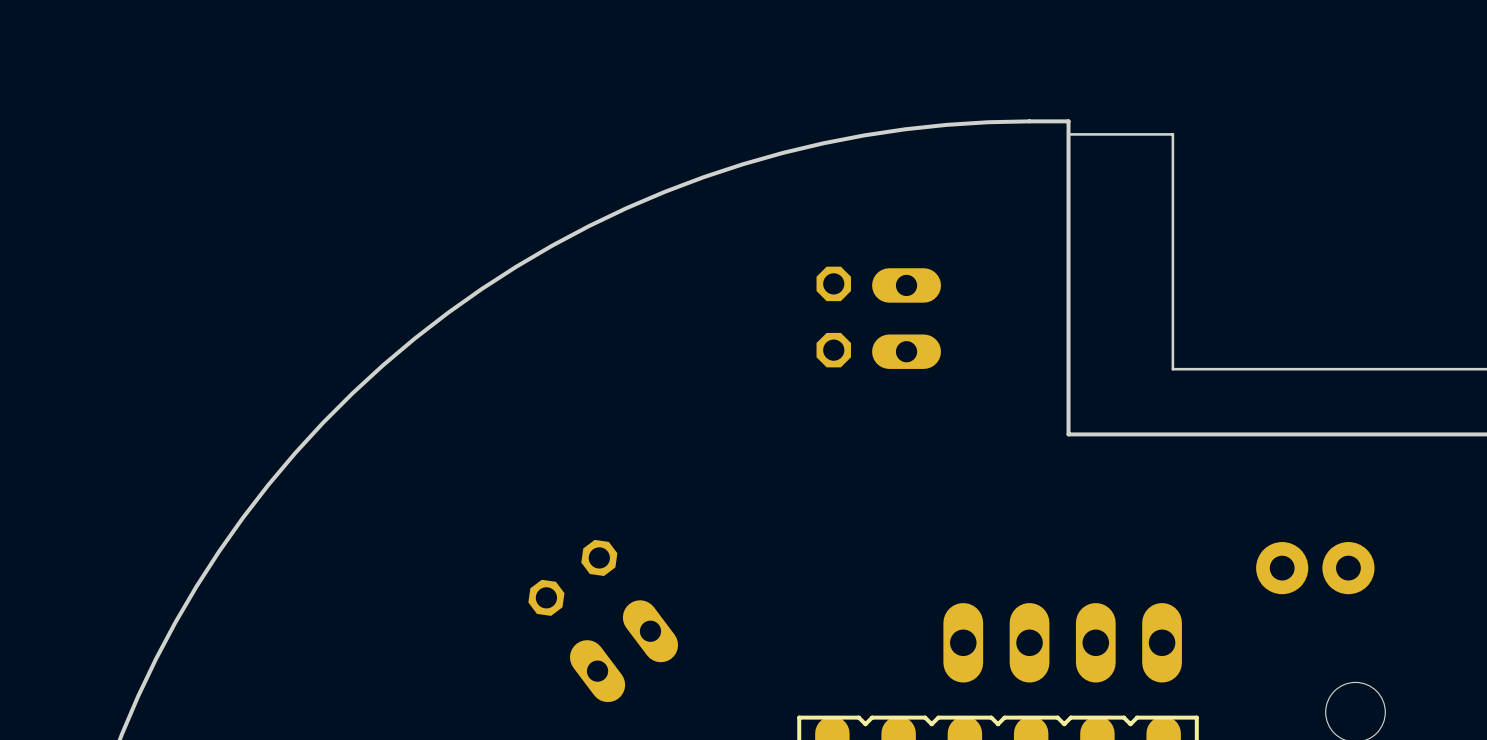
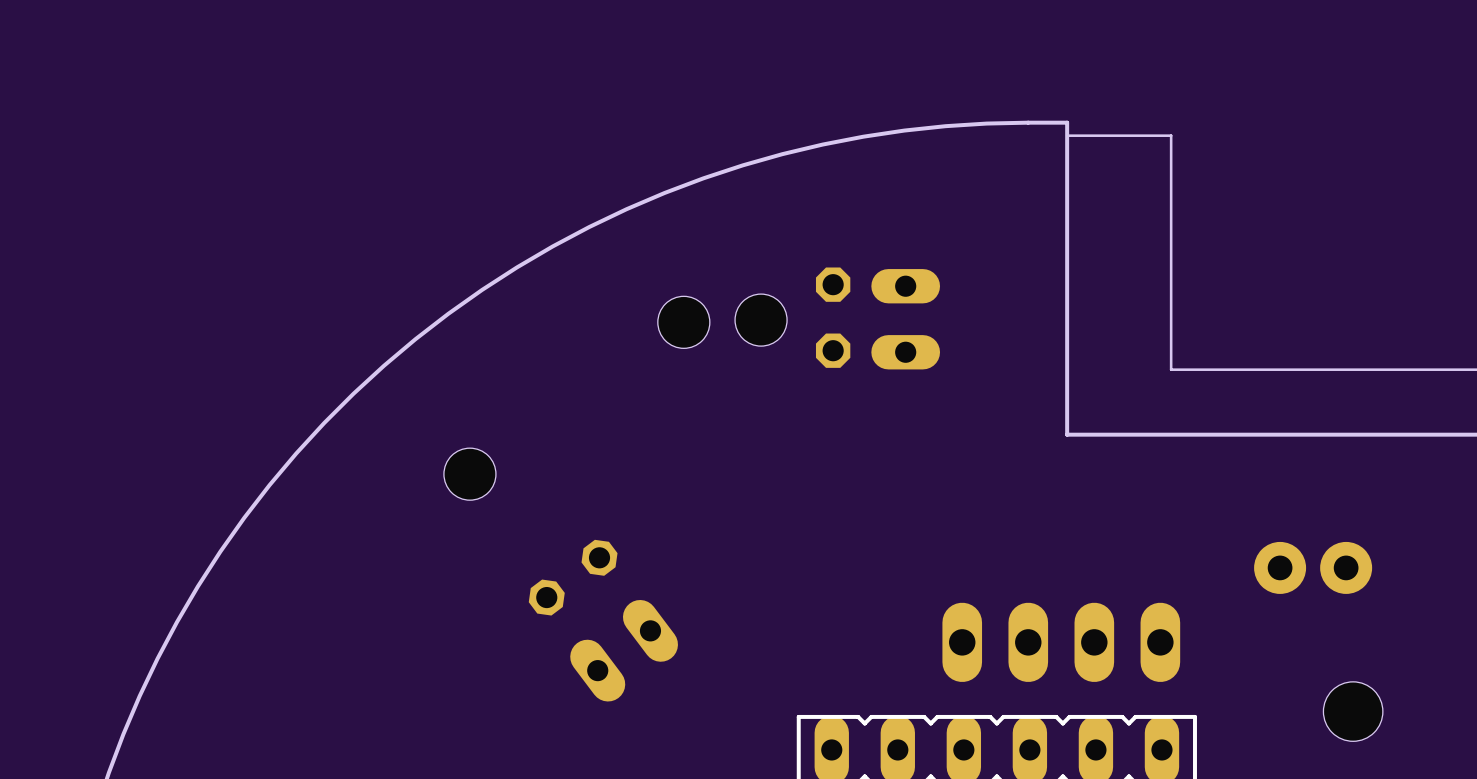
hole: none -> (761, 320)
hole: none -> (683, 322)
hole: none -> (469, 474)

